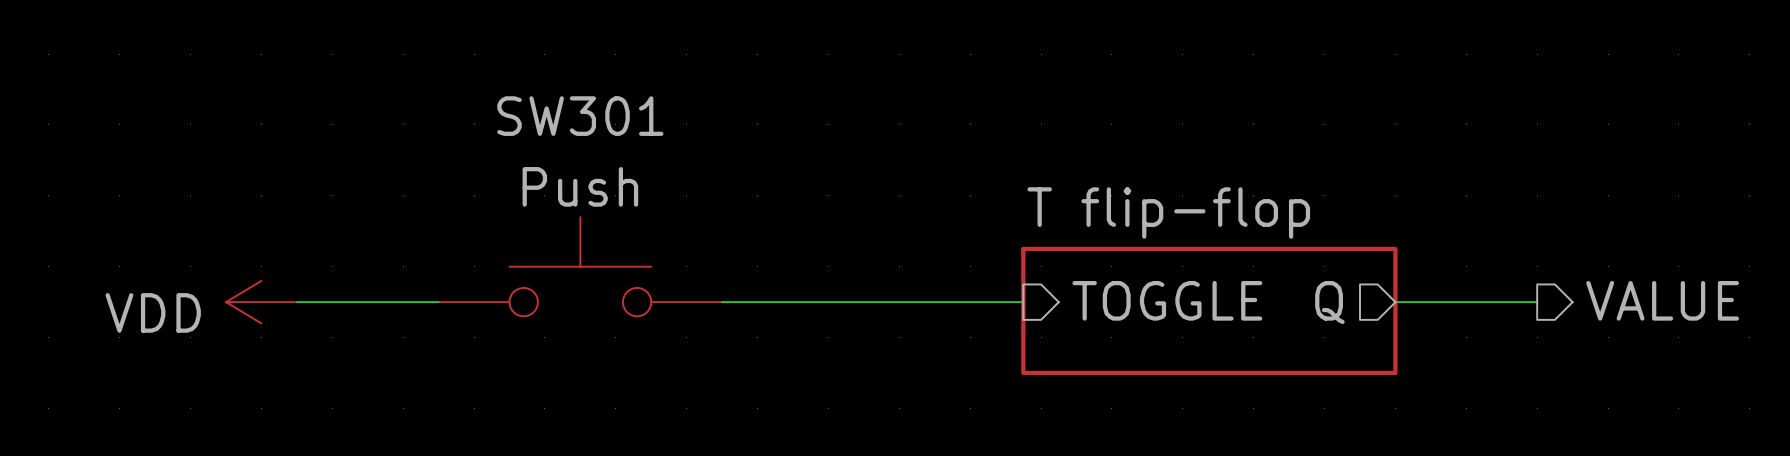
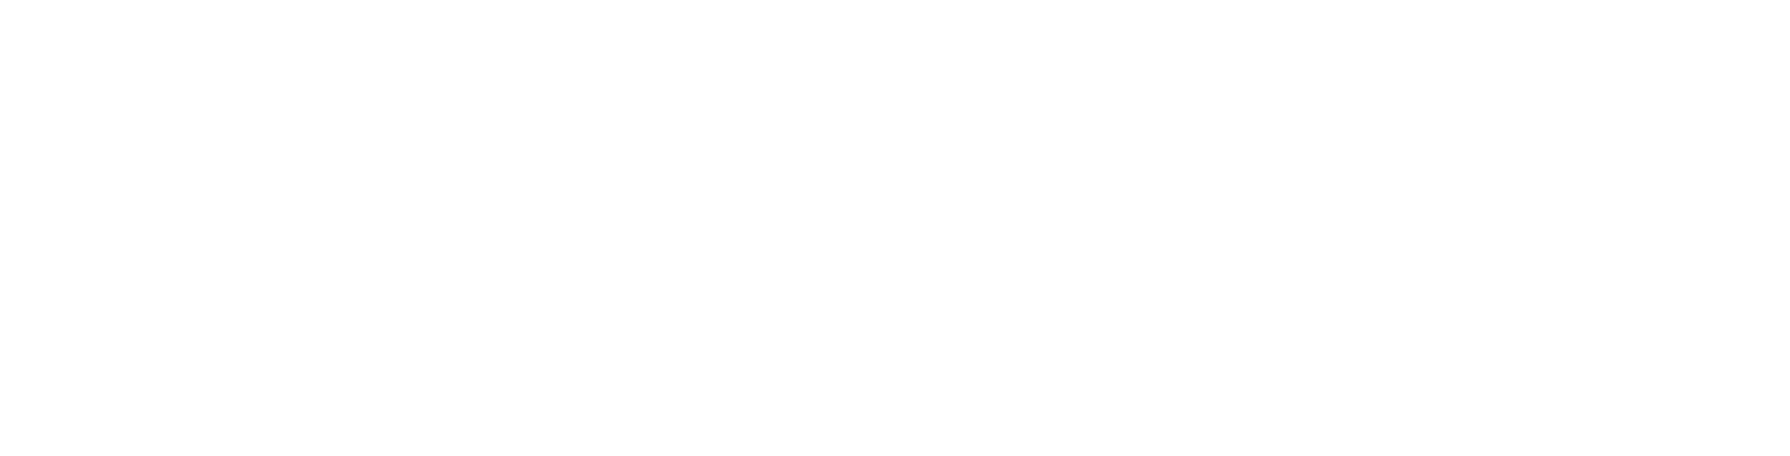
SW301: Push (580, 266) -> none
sheet pin: TOGGLE (1167, 300) -> none
hierarchical label: VALUE (1662, 300) -> none
power symbol: VDD (261, 302) -> none
wire: (296, 302) (438, 302) -> none
wire: (722, 302) (1023, 302) -> none
sheet pin: Q (1329, 302) -> none
wire: (1395, 302) (1537, 302) -> none
sheet T flip-flop: (1209, 311) -> none

